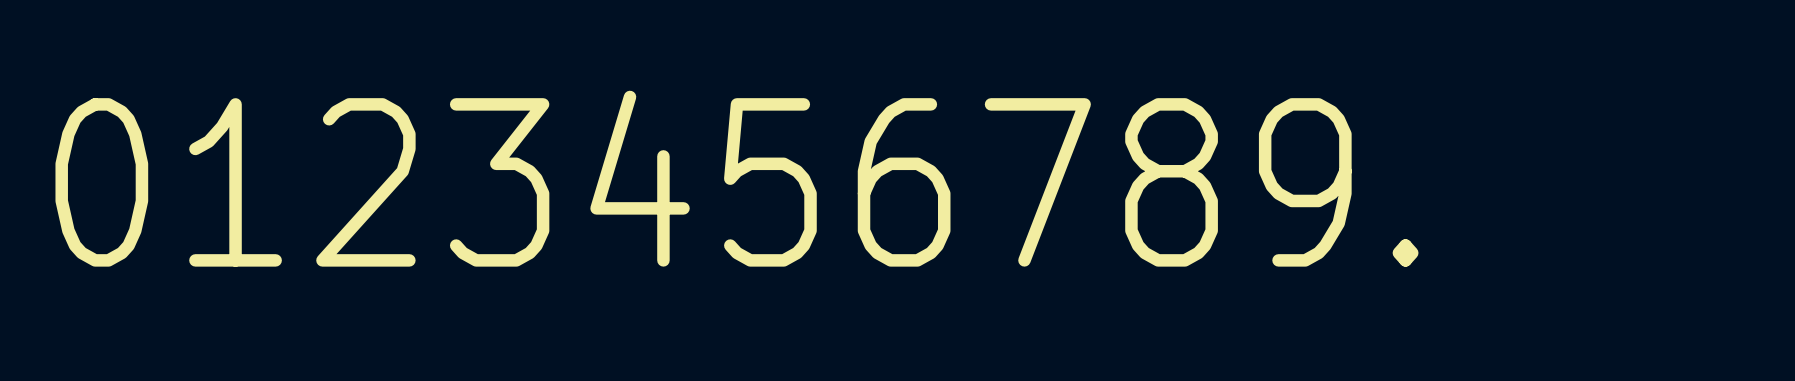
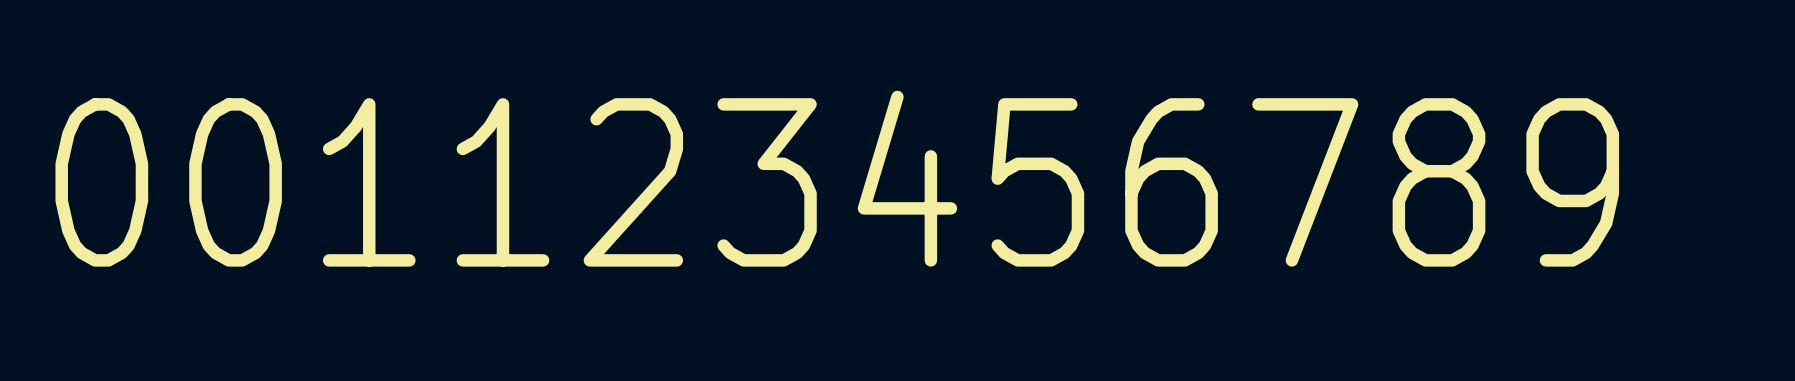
text: 0123456789. (736, 178) -> 001123456789 (837, 178)

